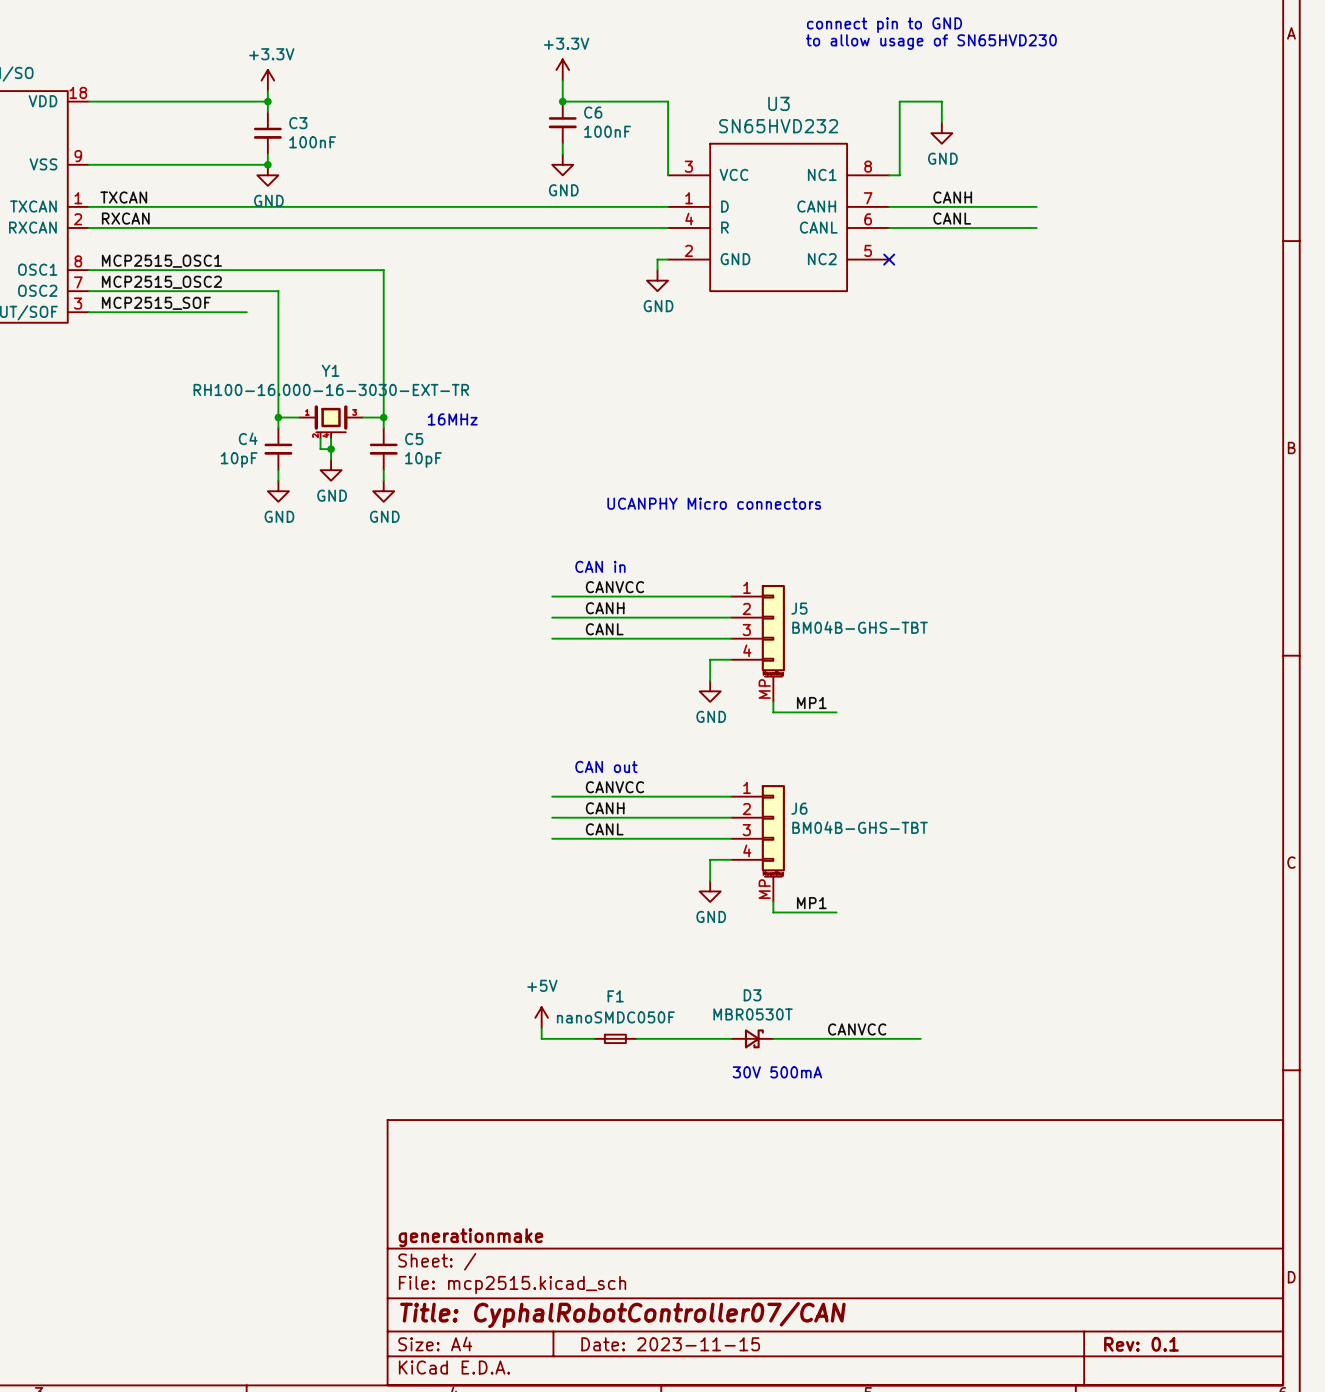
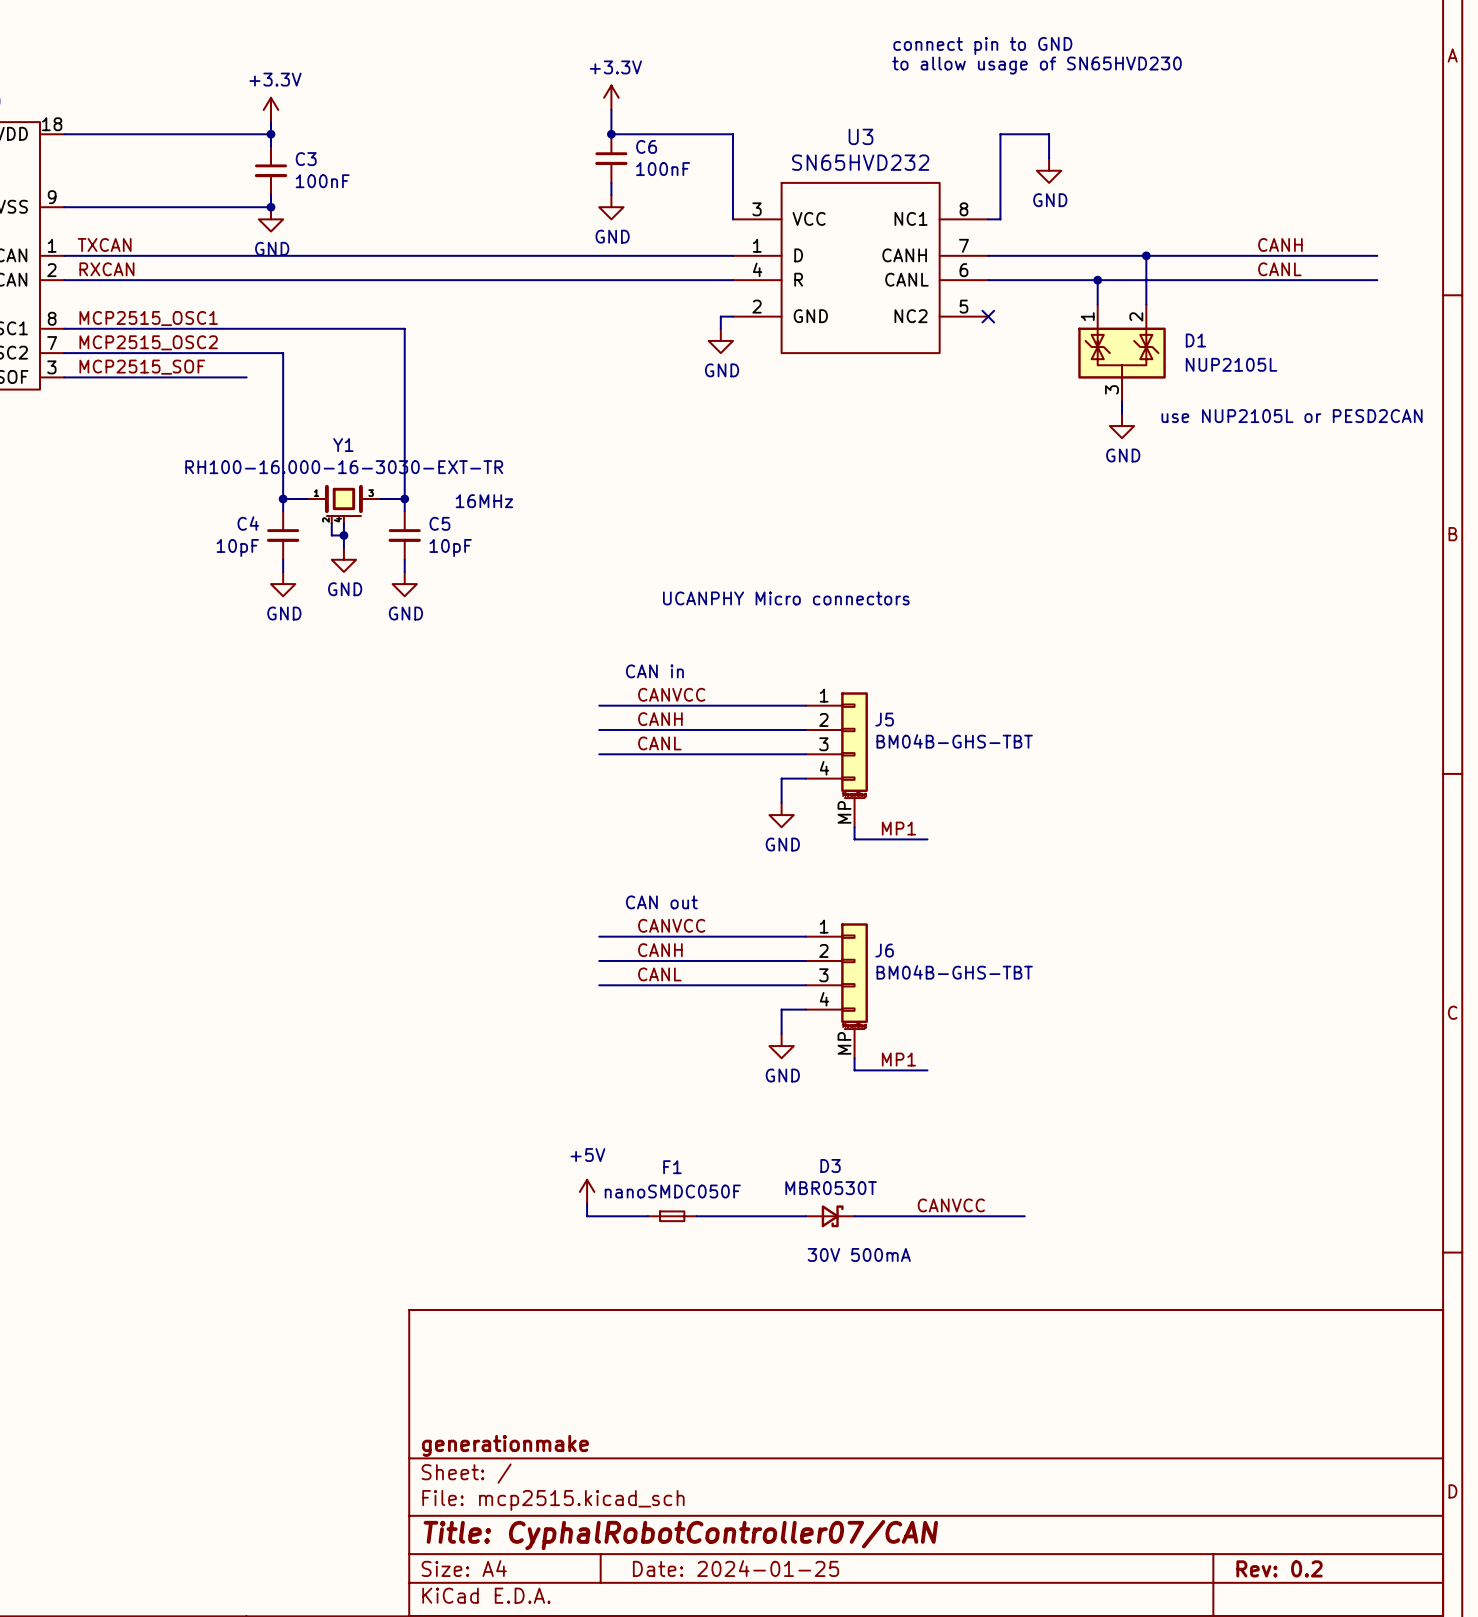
label position: CANH (952, 197) -> CANH (1280, 244)
wire: none -> (1146, 255) (1146, 304)
junction: none -> (1146, 255)
wire: none -> (1158, 255) (1377, 255)
label position: CANL (952, 218) -> CANL (1279, 269)
wire: none -> (1097, 280) (1097, 304)
junction: none -> (1097, 280)
wire: none -> (1158, 280) (1377, 280)
D1: none -> NUP2105L (1122, 353)
wire: none -> (1122, 401) (1122, 413)
text: none -> use NUP2105L or PESD2CAN (1292, 416)
power symbol: none -> GND (1122, 426)
title block: Date: 2023-11-15 (670, 1344) -> Date: 2024-01-25 (736, 1568)
title block: Rev: 0.1 (1141, 1344) -> Rev: 0.2 (1279, 1568)

